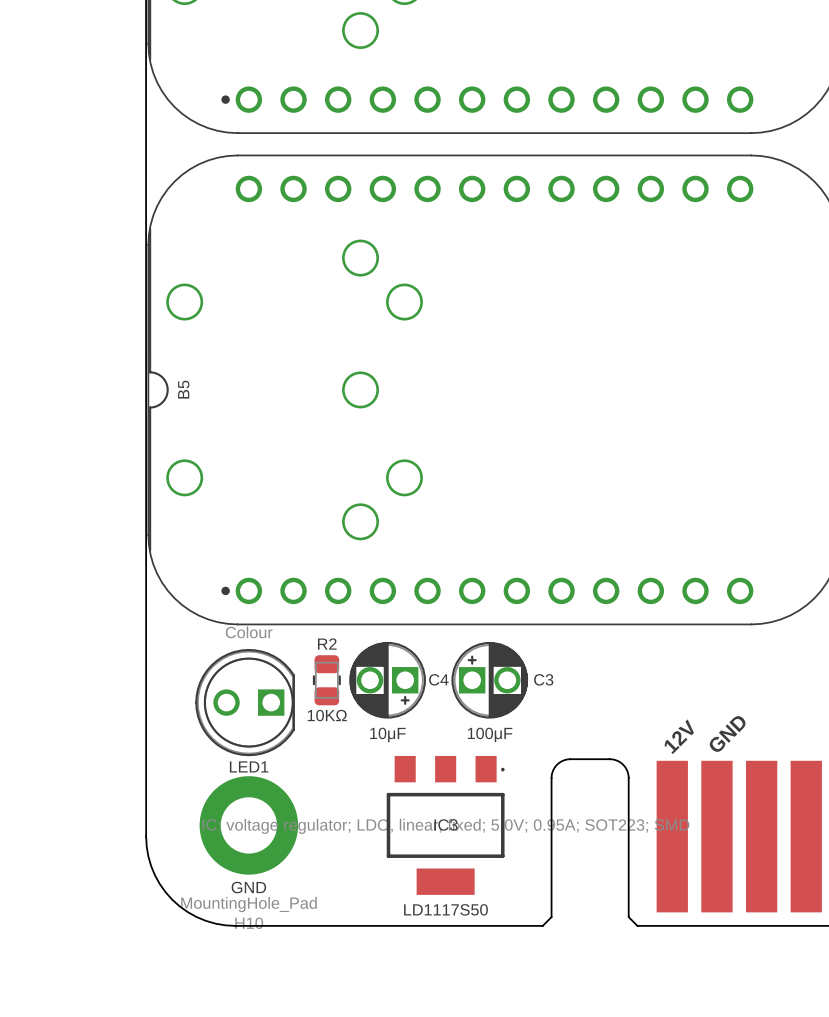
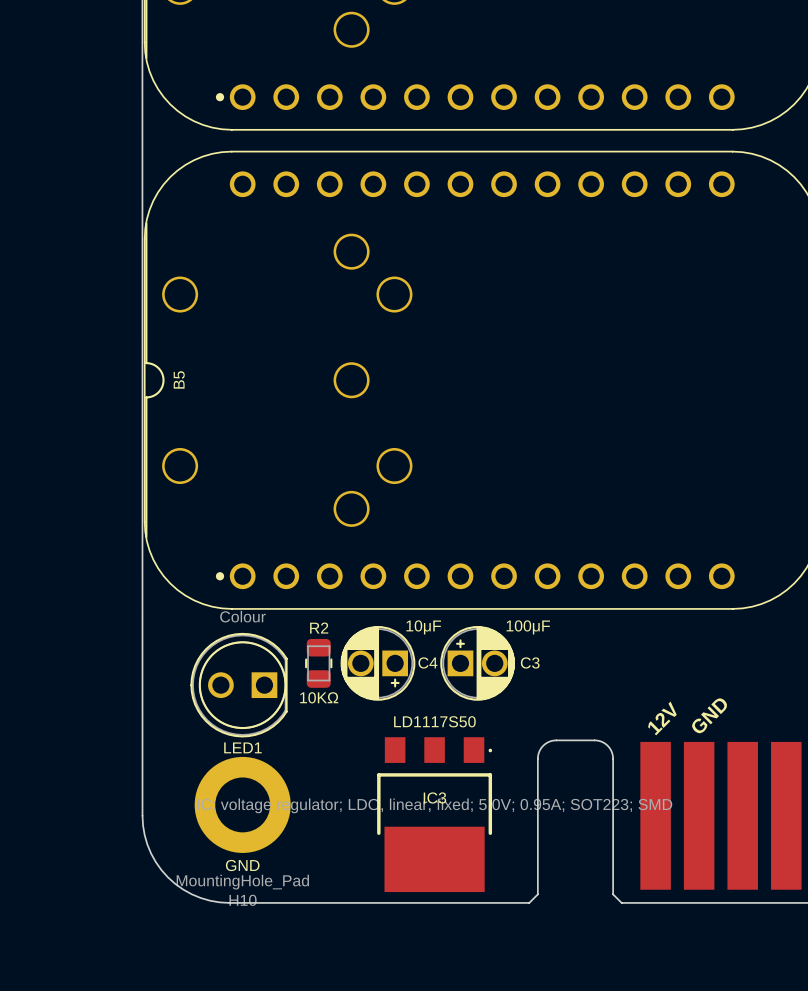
C4 value position: 10μF (387, 734) -> 10μF (423, 627)
C3 value position: 100μF (490, 734) -> 100μF (528, 627)
IC3 footprint: [386, 755, 505, 895] -> [377, 737, 493, 893]
IC3 text position: LD1117S50 (445, 909) -> LD1117S50 (434, 721)

